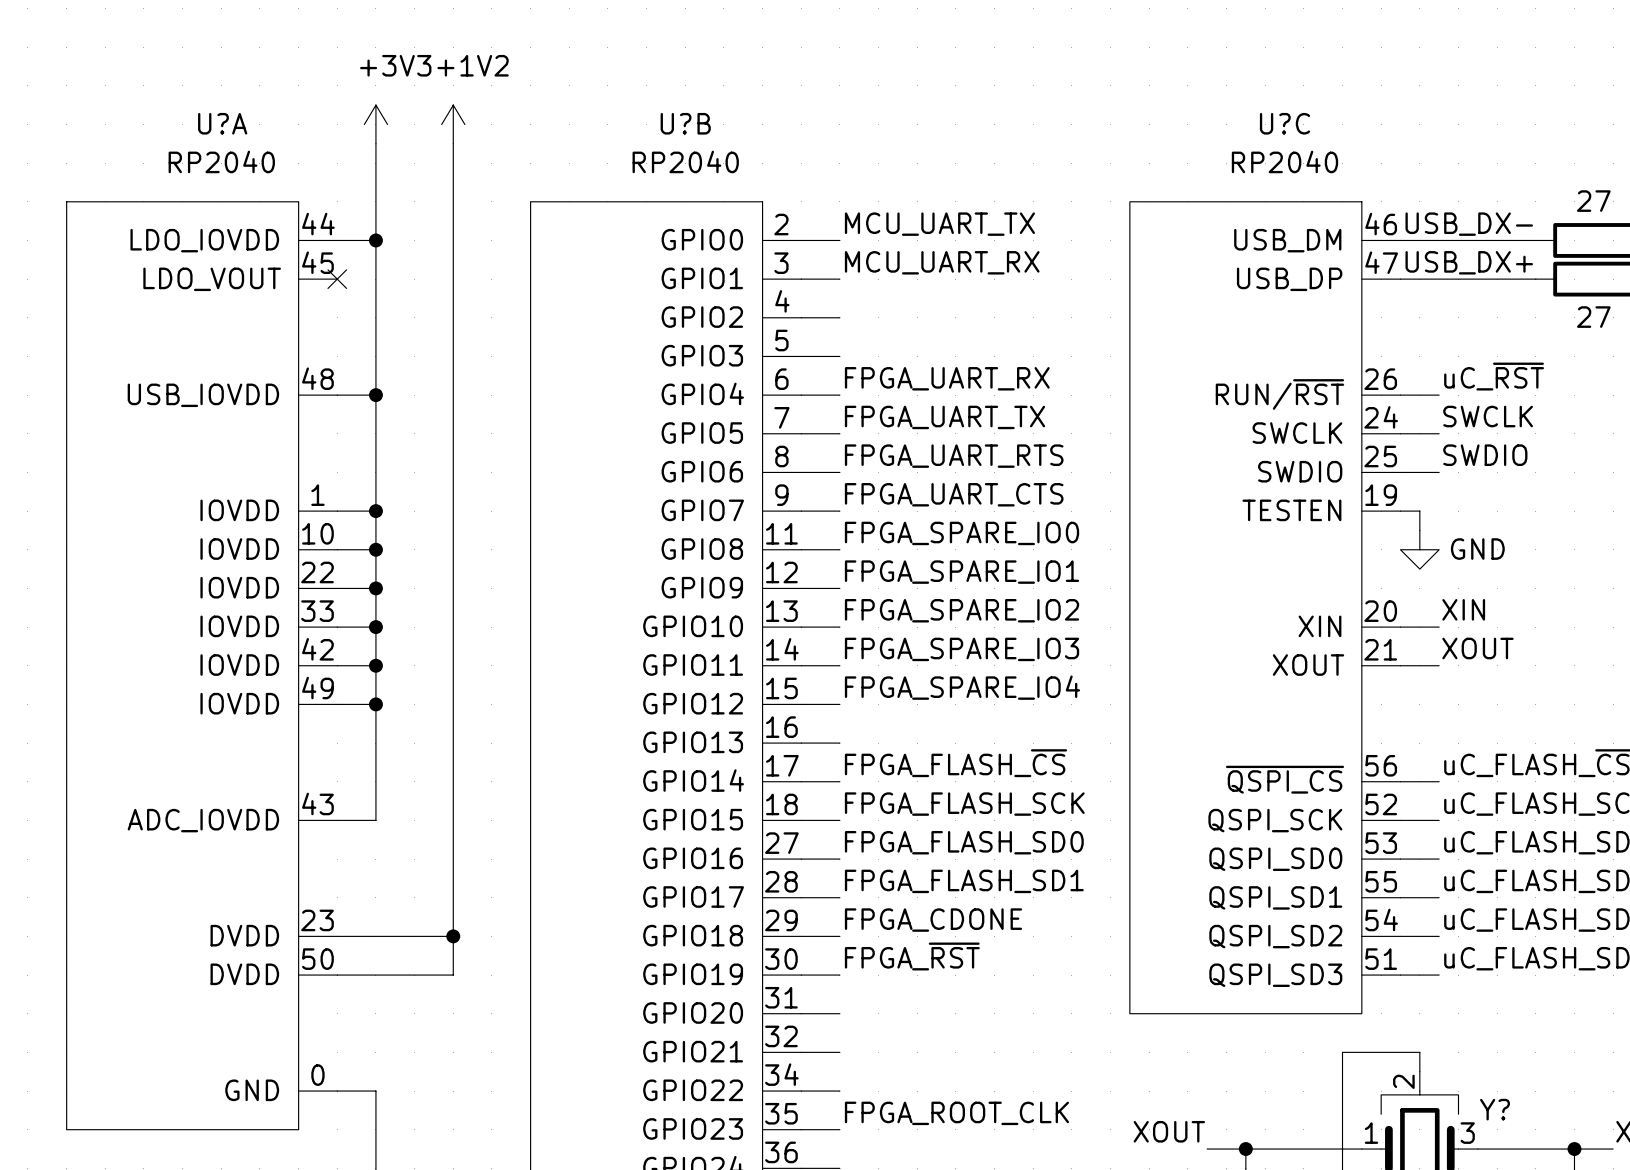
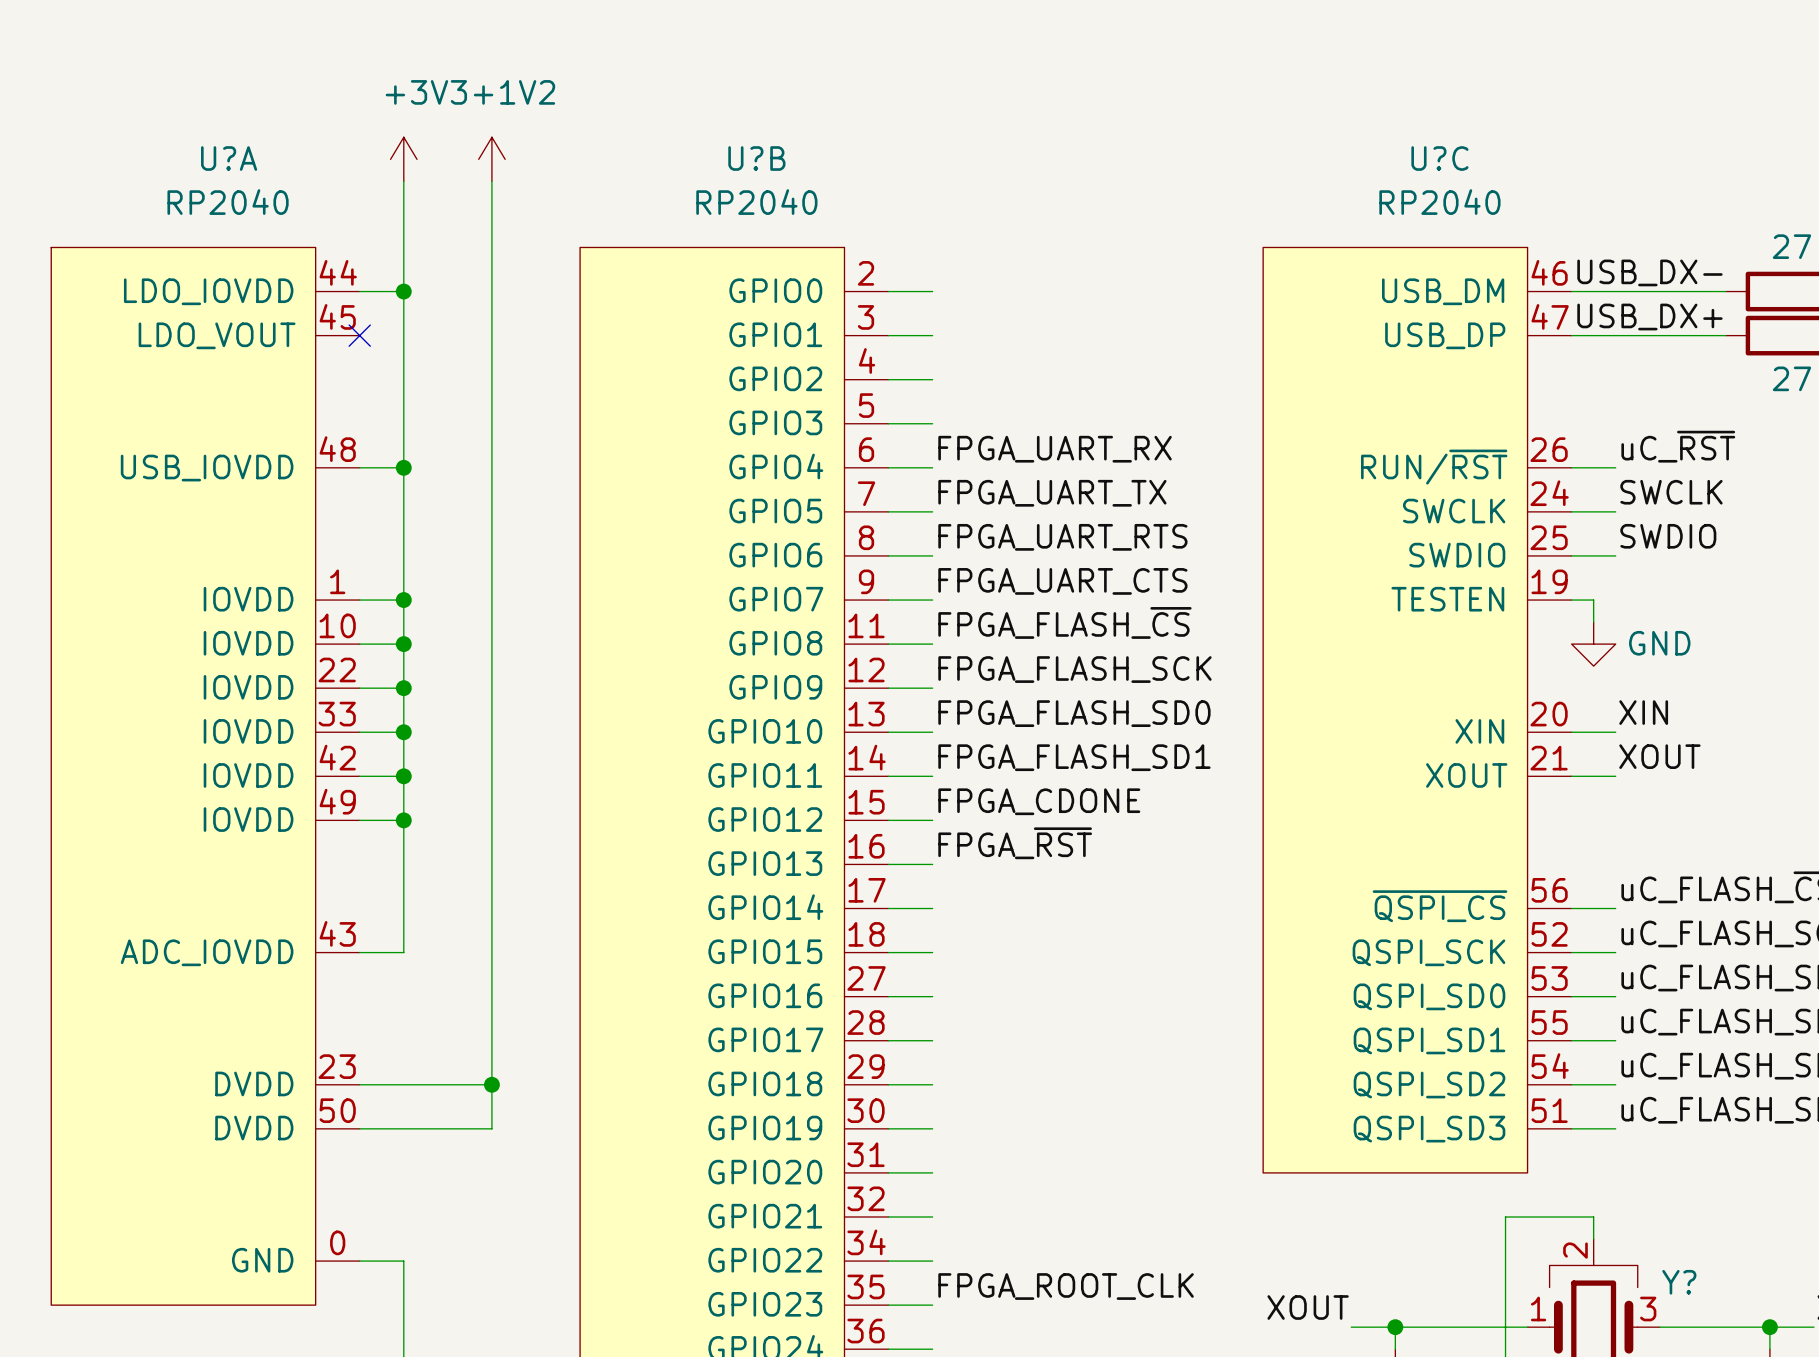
label: MCU_UART_TX (939, 224) -> none
label: MCU_UART_RX (942, 262) -> none
label: FPGA_SPARE_IO0 (962, 533) -> FPGA_FLASH_~{CS} (1064, 622)
label: FPGA_SPARE_IO1 (962, 572) -> FPGA_FLASH_SCK (1074, 669)
label: FPGA_SPARE_IO2 (962, 610) -> FPGA_FLASH_SD0 (1074, 713)
label: FPGA_SPARE_IO3 (962, 649) -> FPGA_FLASH_SD1 (1074, 757)
label: FPGA_SPARE_IO4 (962, 687) -> FPGA_CDONE (1039, 801)
label: FPGA_FLASH_~{CS} (955, 763) -> none
label: FPGA_FLASH_SCK (964, 804) -> none
label: FPGA_FLASH_SD0 (964, 842) -> none
label: FPGA_FLASH_SD1 (964, 881) -> none
label: FPGA_CDONE (933, 920) -> none
label position: FPGA_~{RST} (912, 956) -> FPGA_~{RST} (1015, 843)

